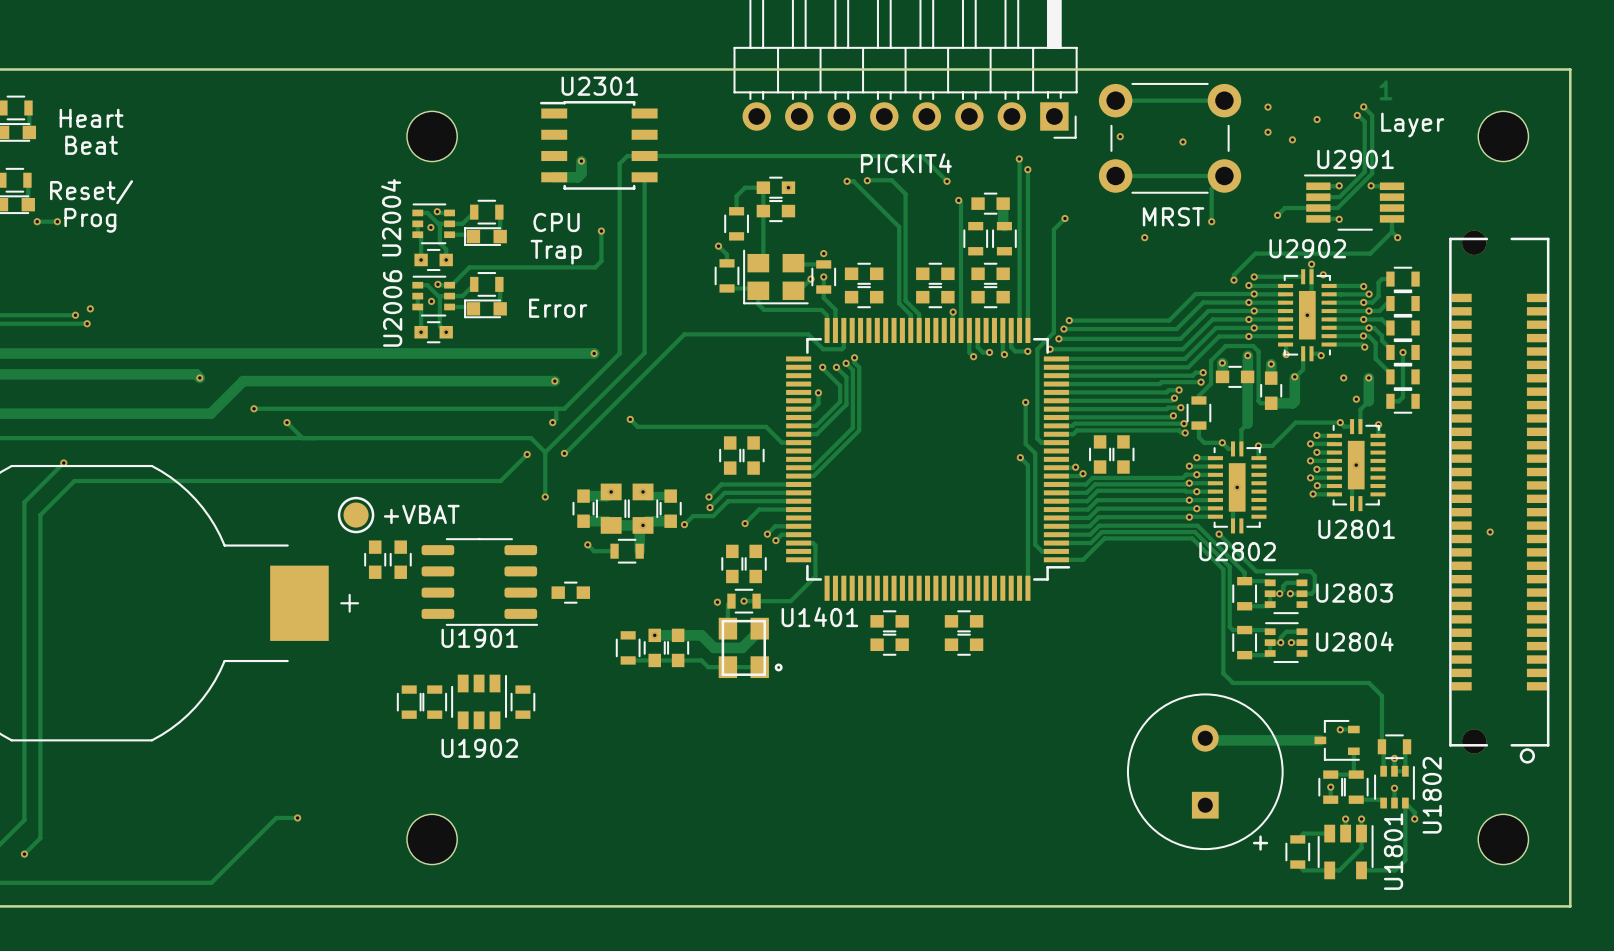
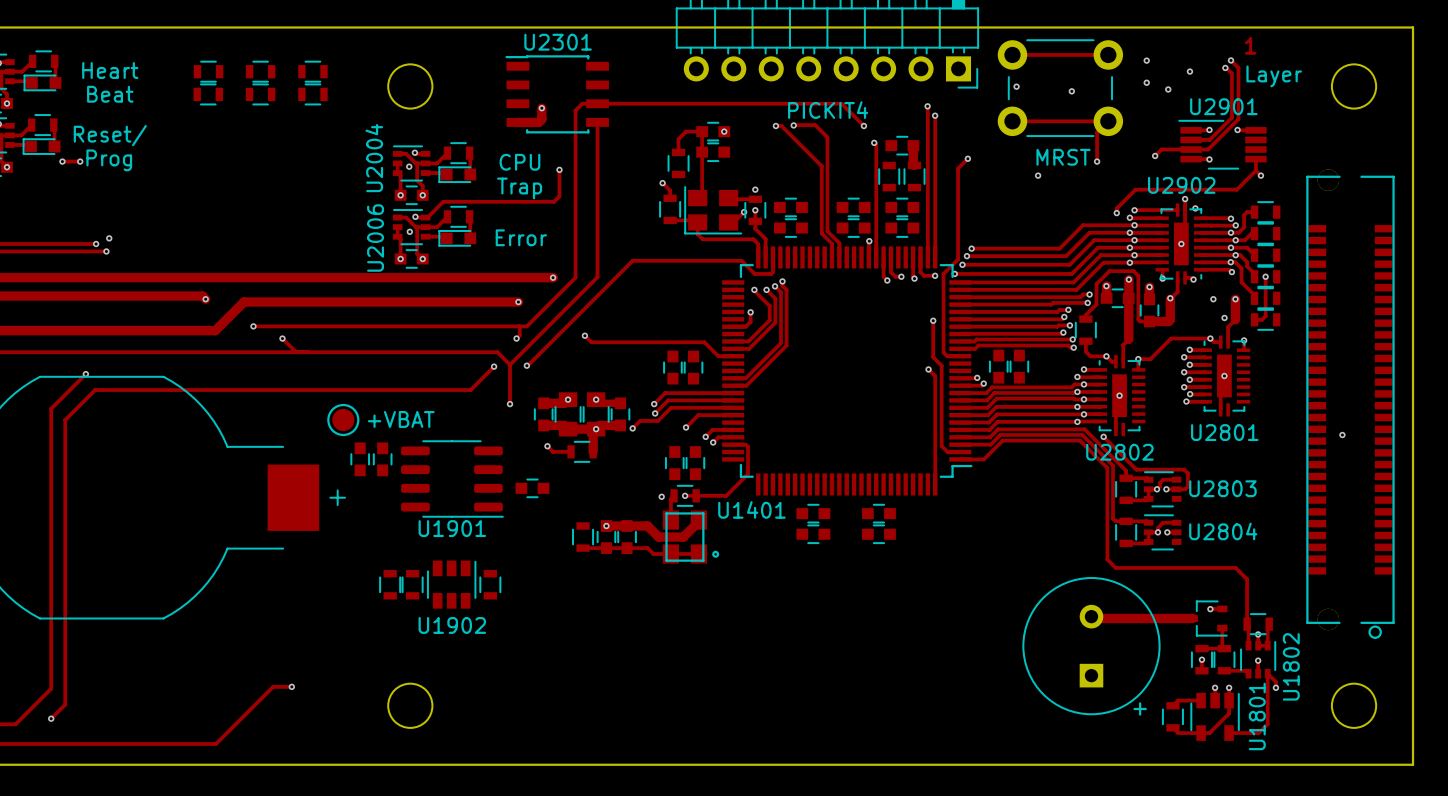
part: none -> (208, 71)
part: none -> (260, 71)
part: none -> (312, 71)
part: none -> (208, 94)
part: none -> (260, 94)
part: none -> (312, 94)

